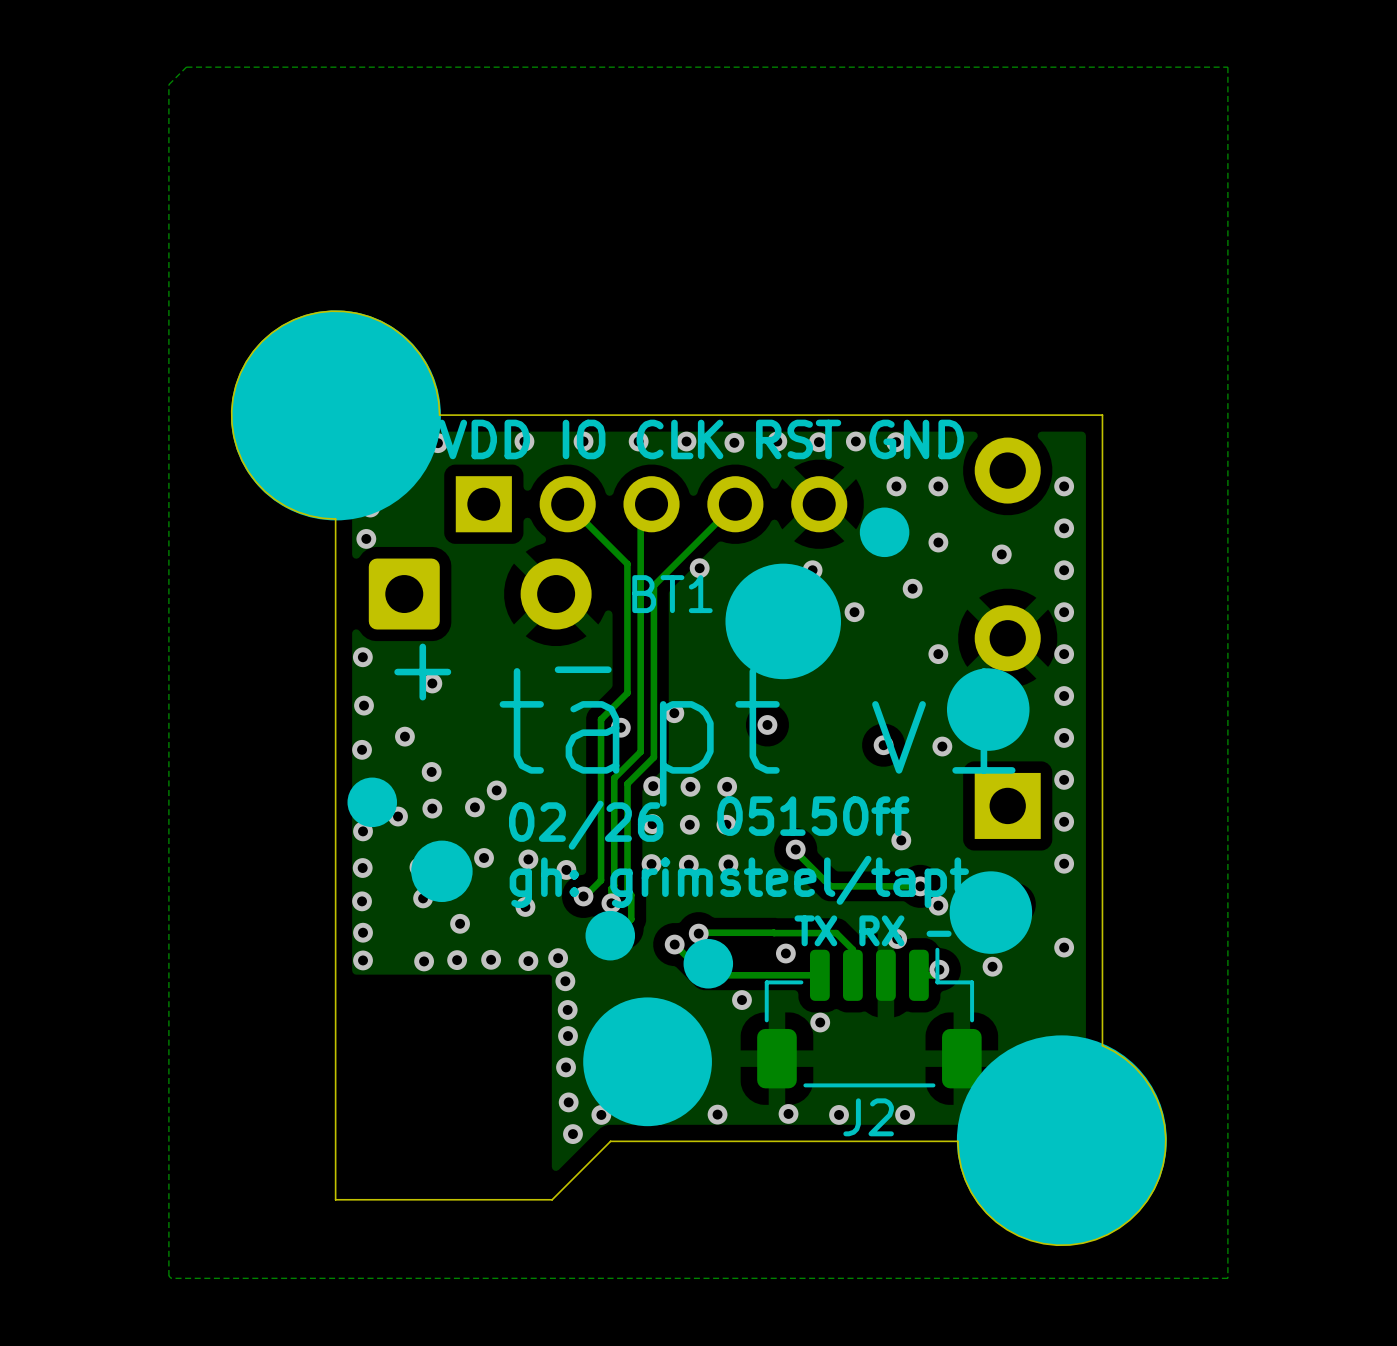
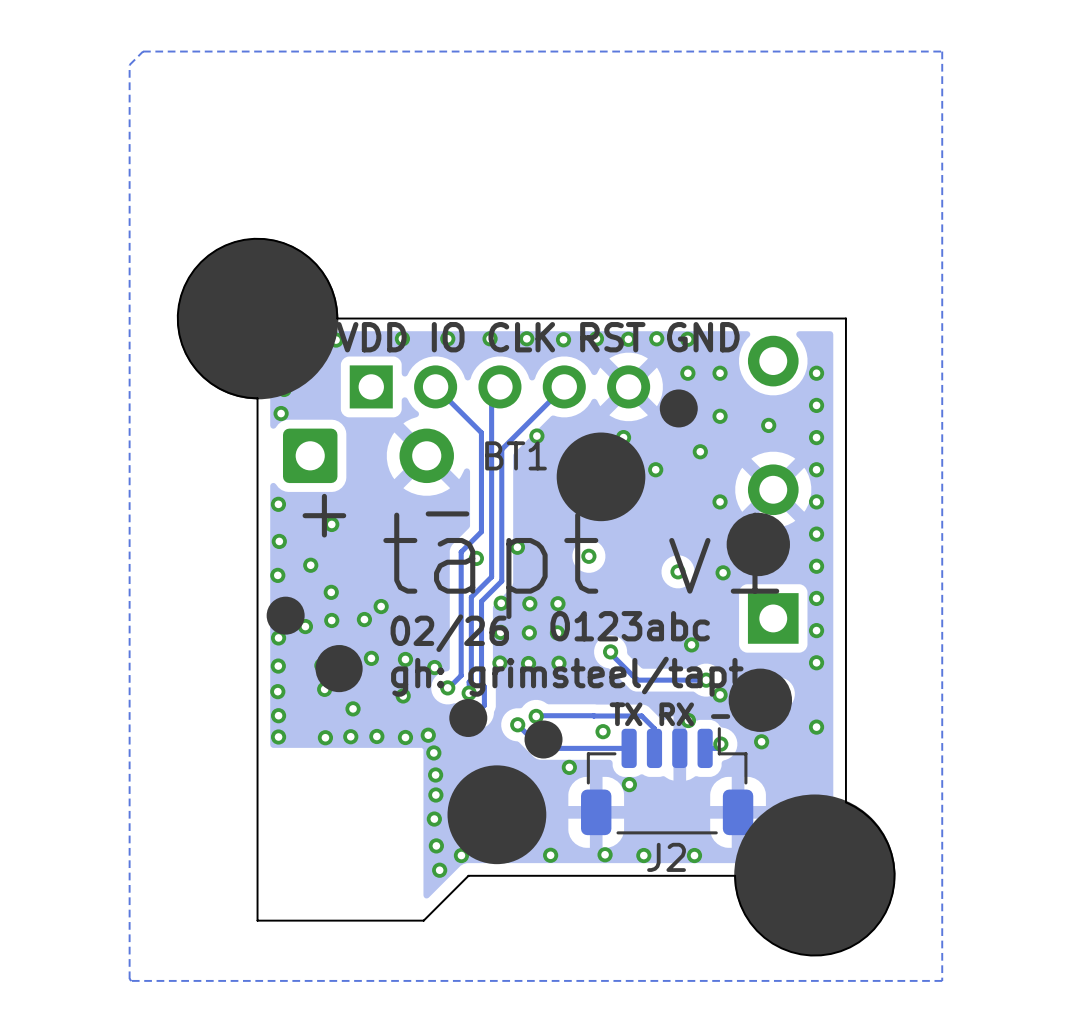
text: 05150ff (813, 816) -> 0123abc (630, 626)

